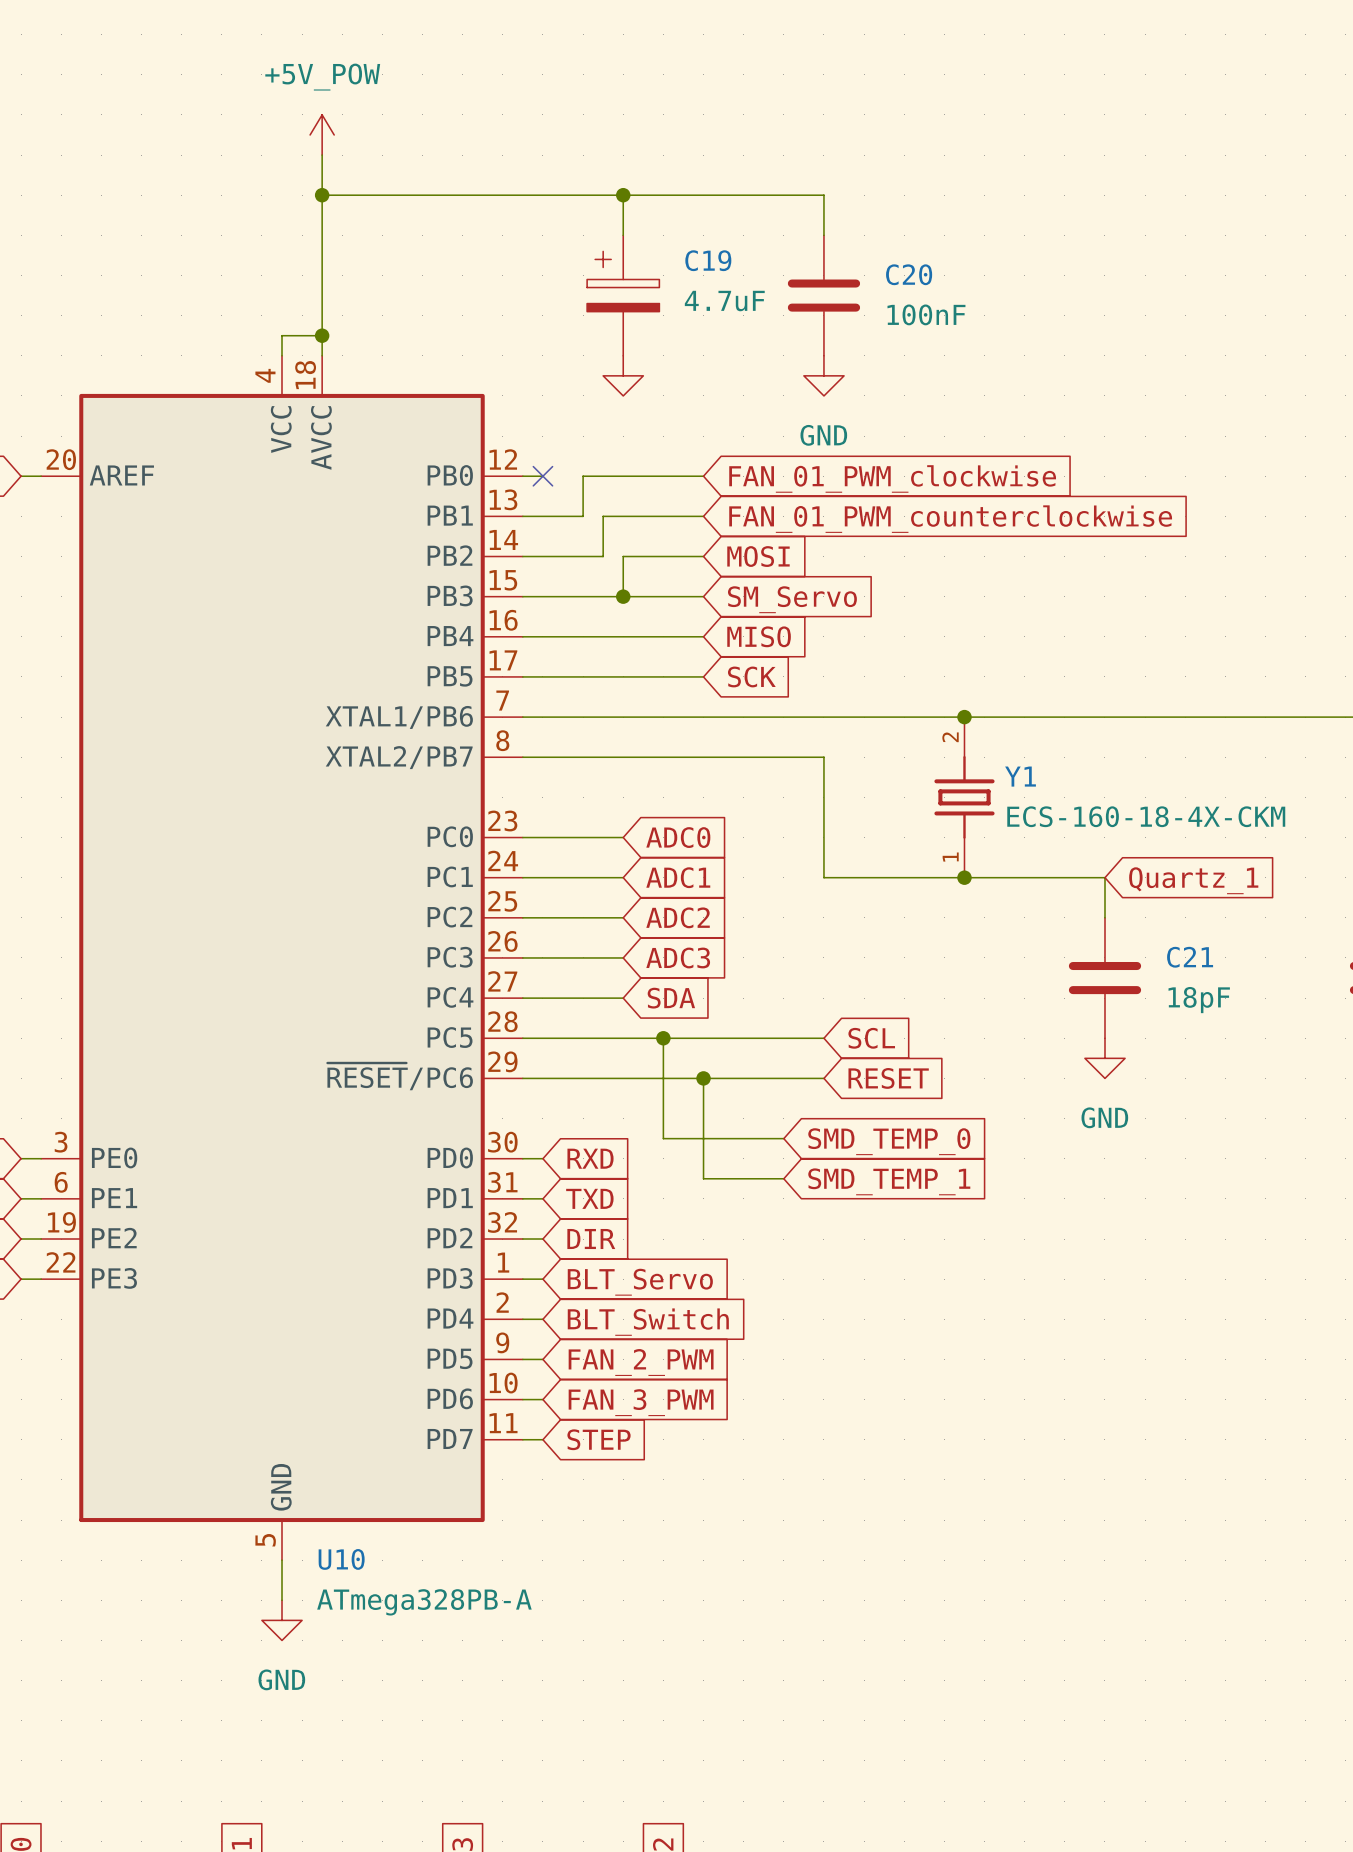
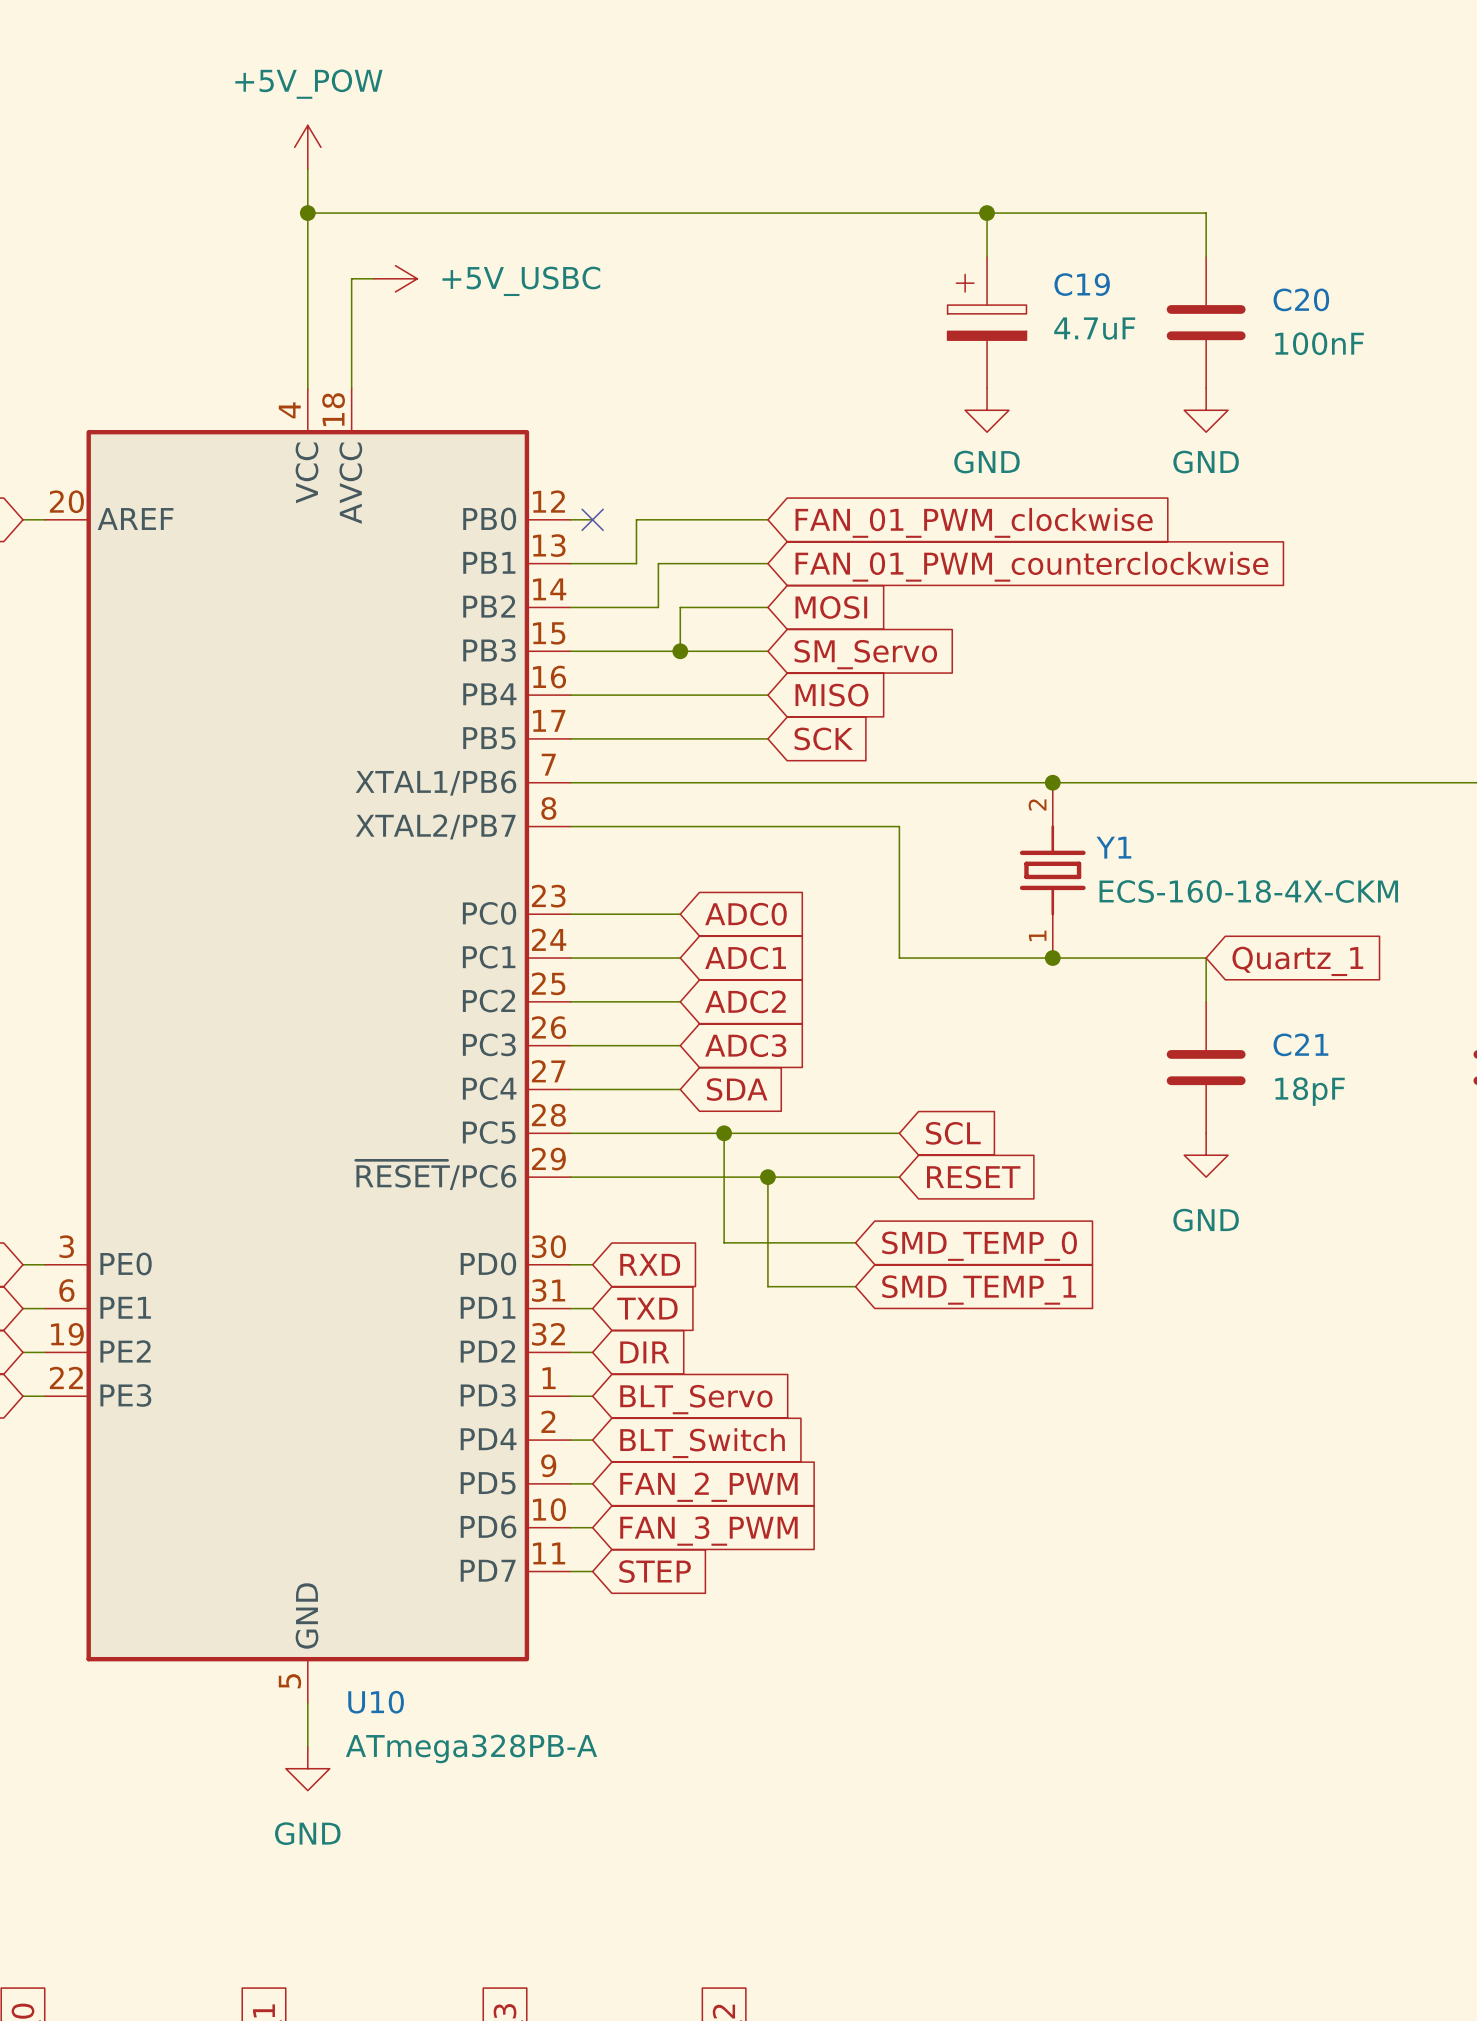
power symbol position: +5V_POW (322, 134) -> +5V_POW (307, 147)
wire: (322, 155) (322, 255) -> (373, 278) (351, 278)
wire: none -> (307, 213) (351, 213)
junction position: (322, 195) -> (307, 213)
wire: (623, 195) (623, 235) -> (987, 213) (987, 256)
junction: (623, 195) -> none
wire: (823, 195) (823, 235) -> (899, 213) (1206, 213) (1206, 256)
junction: none -> (987, 213)
power symbol: none -> +5V_USBC (395, 278)
C19 position: (623, 295) -> (987, 322)
C20 position: (823, 295) -> (1206, 322)
wire: (282, 335) (322, 335) -> (307, 366) (307, 169)
junction: (322, 335) -> none
power symbol: (623, 375) -> none
power symbol position: GND (823, 375) -> GND (987, 410)
power symbol: none -> GND (1206, 410)
power symbol text position: GND (823, 435) -> GND (986, 462)

